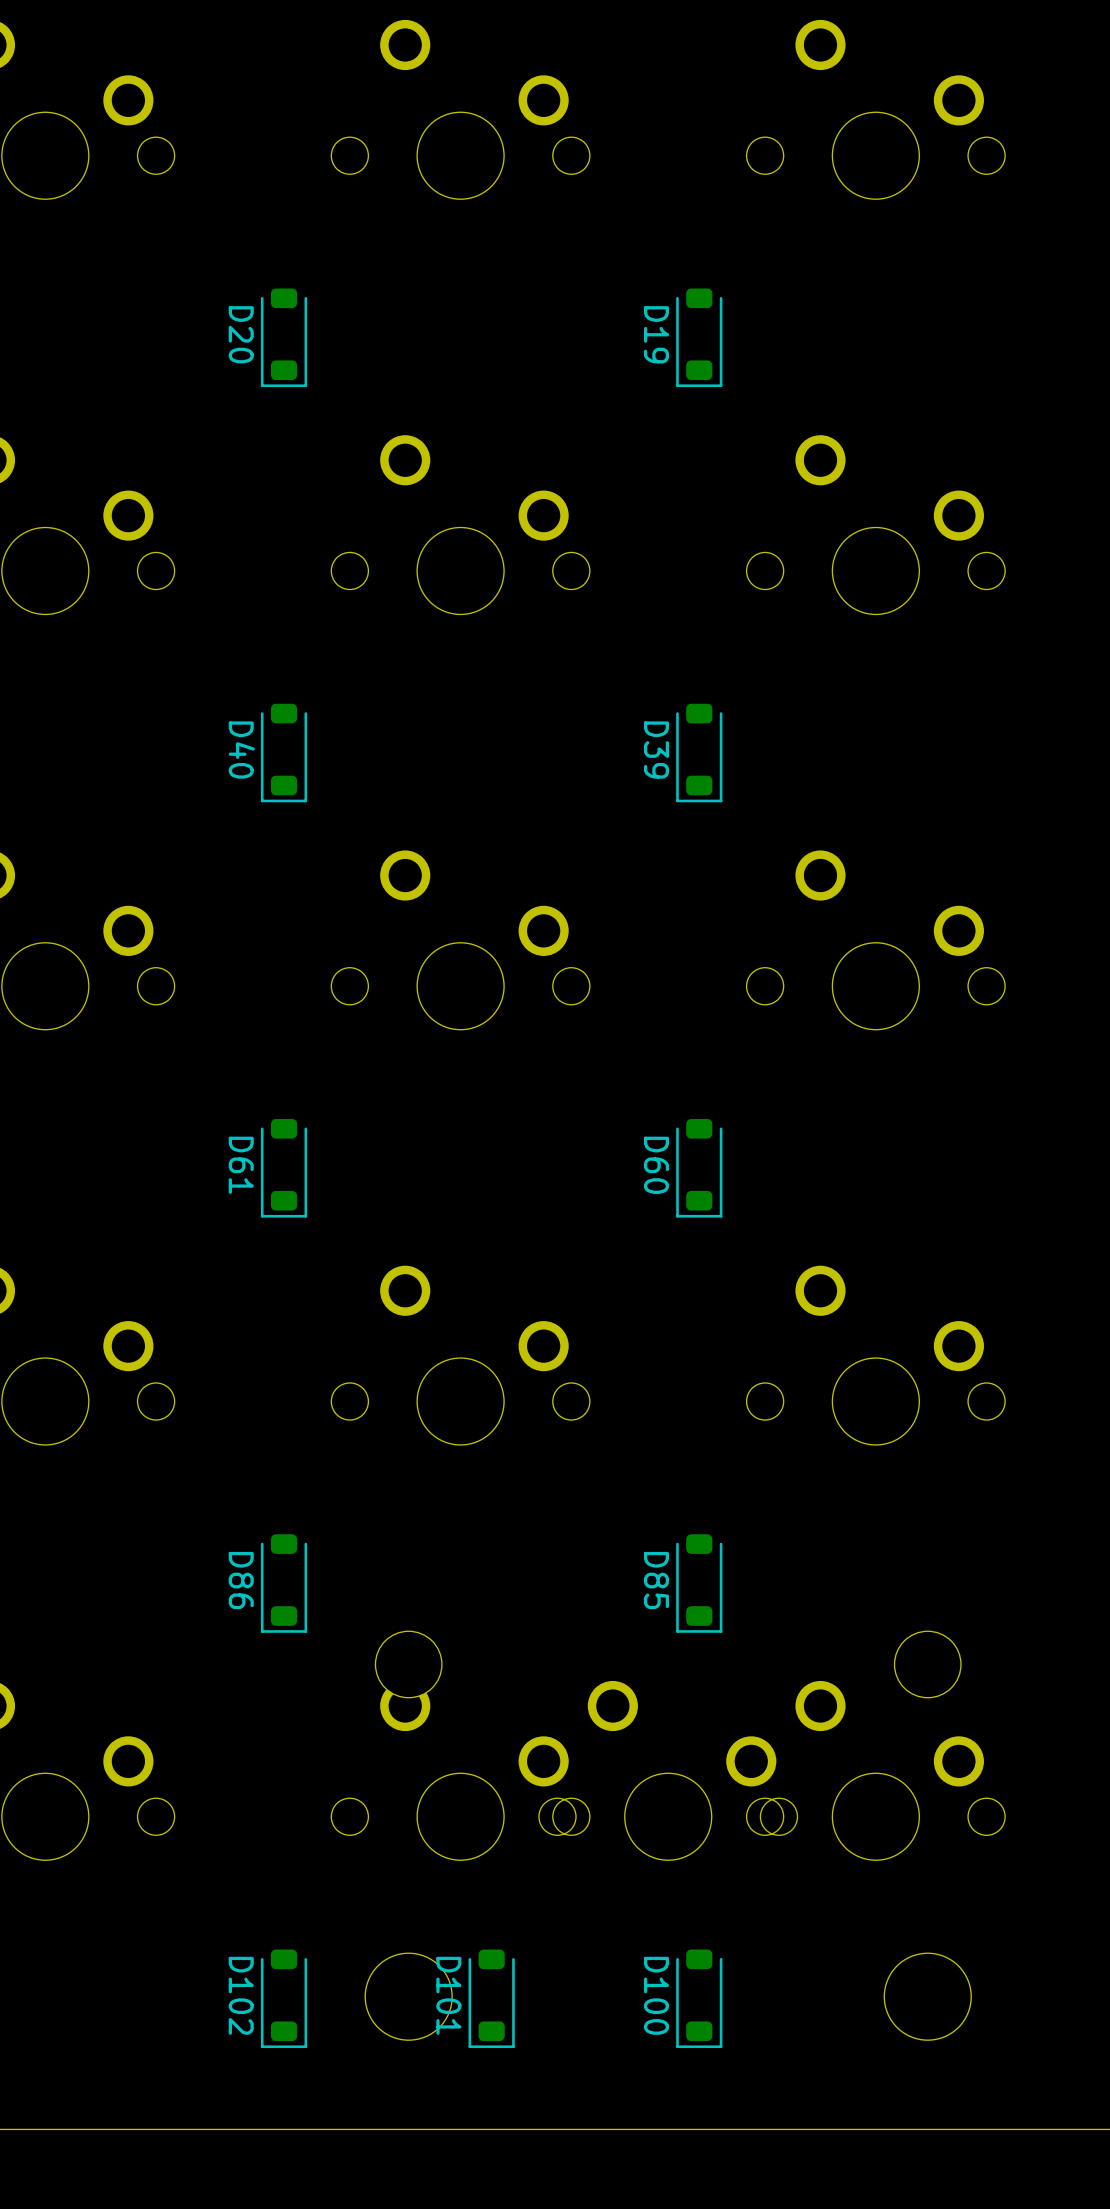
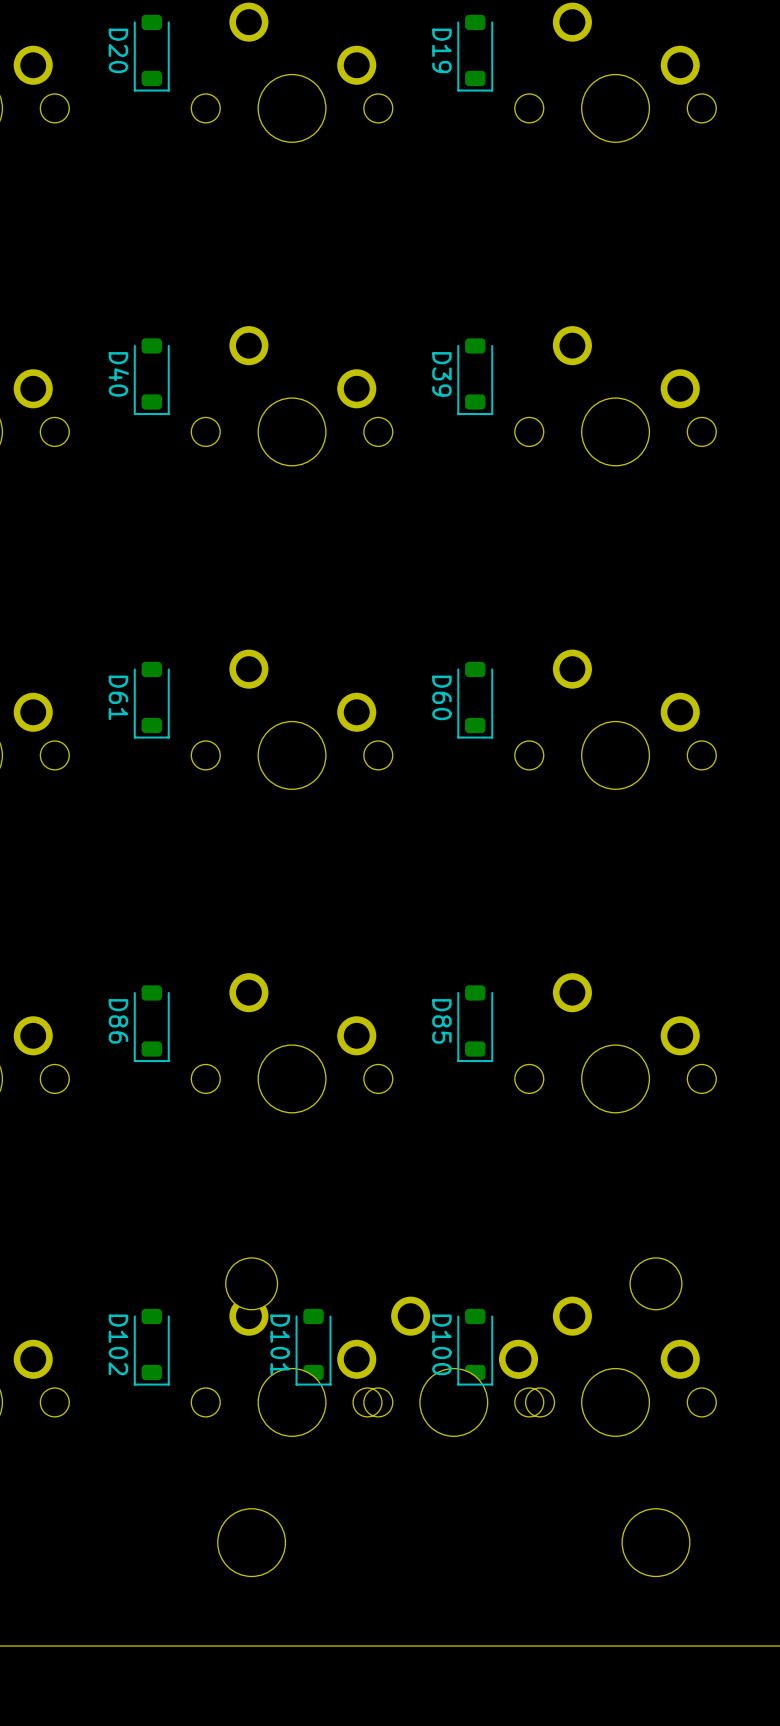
D20 position: (284, 337) -> (151, 53)
D19 position: (699, 337) -> (475, 53)
D40 position: (284, 753) -> (151, 376)
D39 position: (699, 753) -> (475, 376)
D61 position: (284, 1168) -> (151, 700)
D60 position: (699, 1168) -> (475, 700)
D86 position: (284, 1583) -> (151, 1023)
D85 position: (699, 1583) -> (475, 1023)
D102 position: (284, 1998) -> (151, 1347)
D101 position: (491, 1998) -> (313, 1347)
D100 position: (699, 1998) -> (475, 1347)

